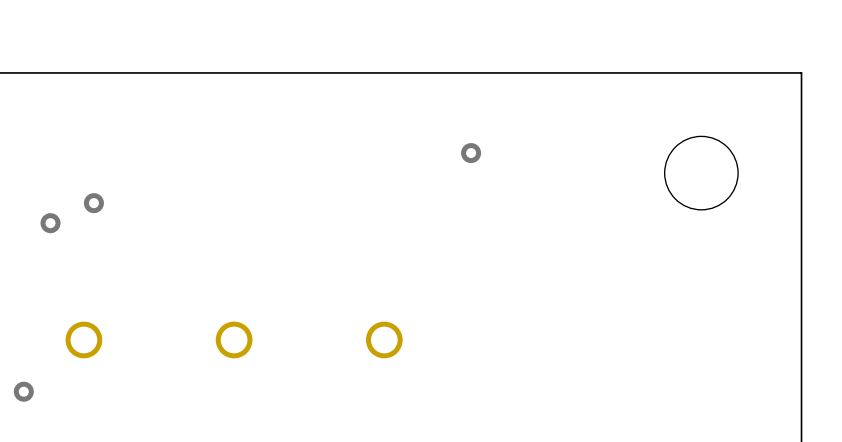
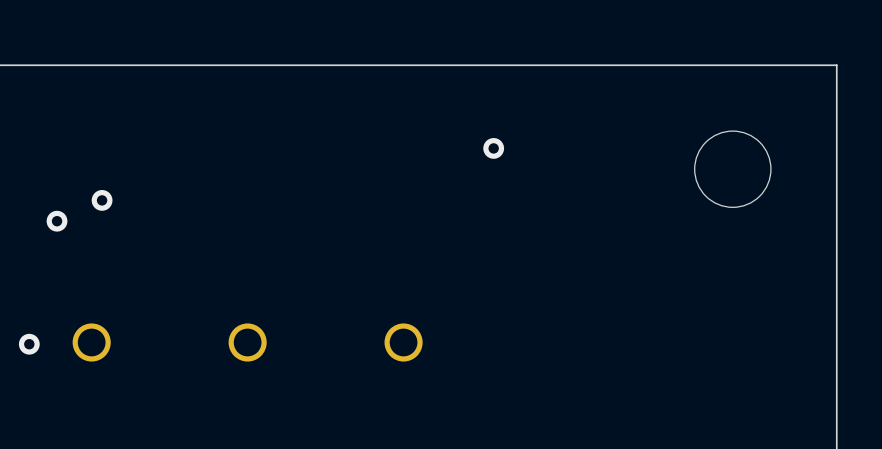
via: none -> (29, 344)
via: (23, 391) -> none

